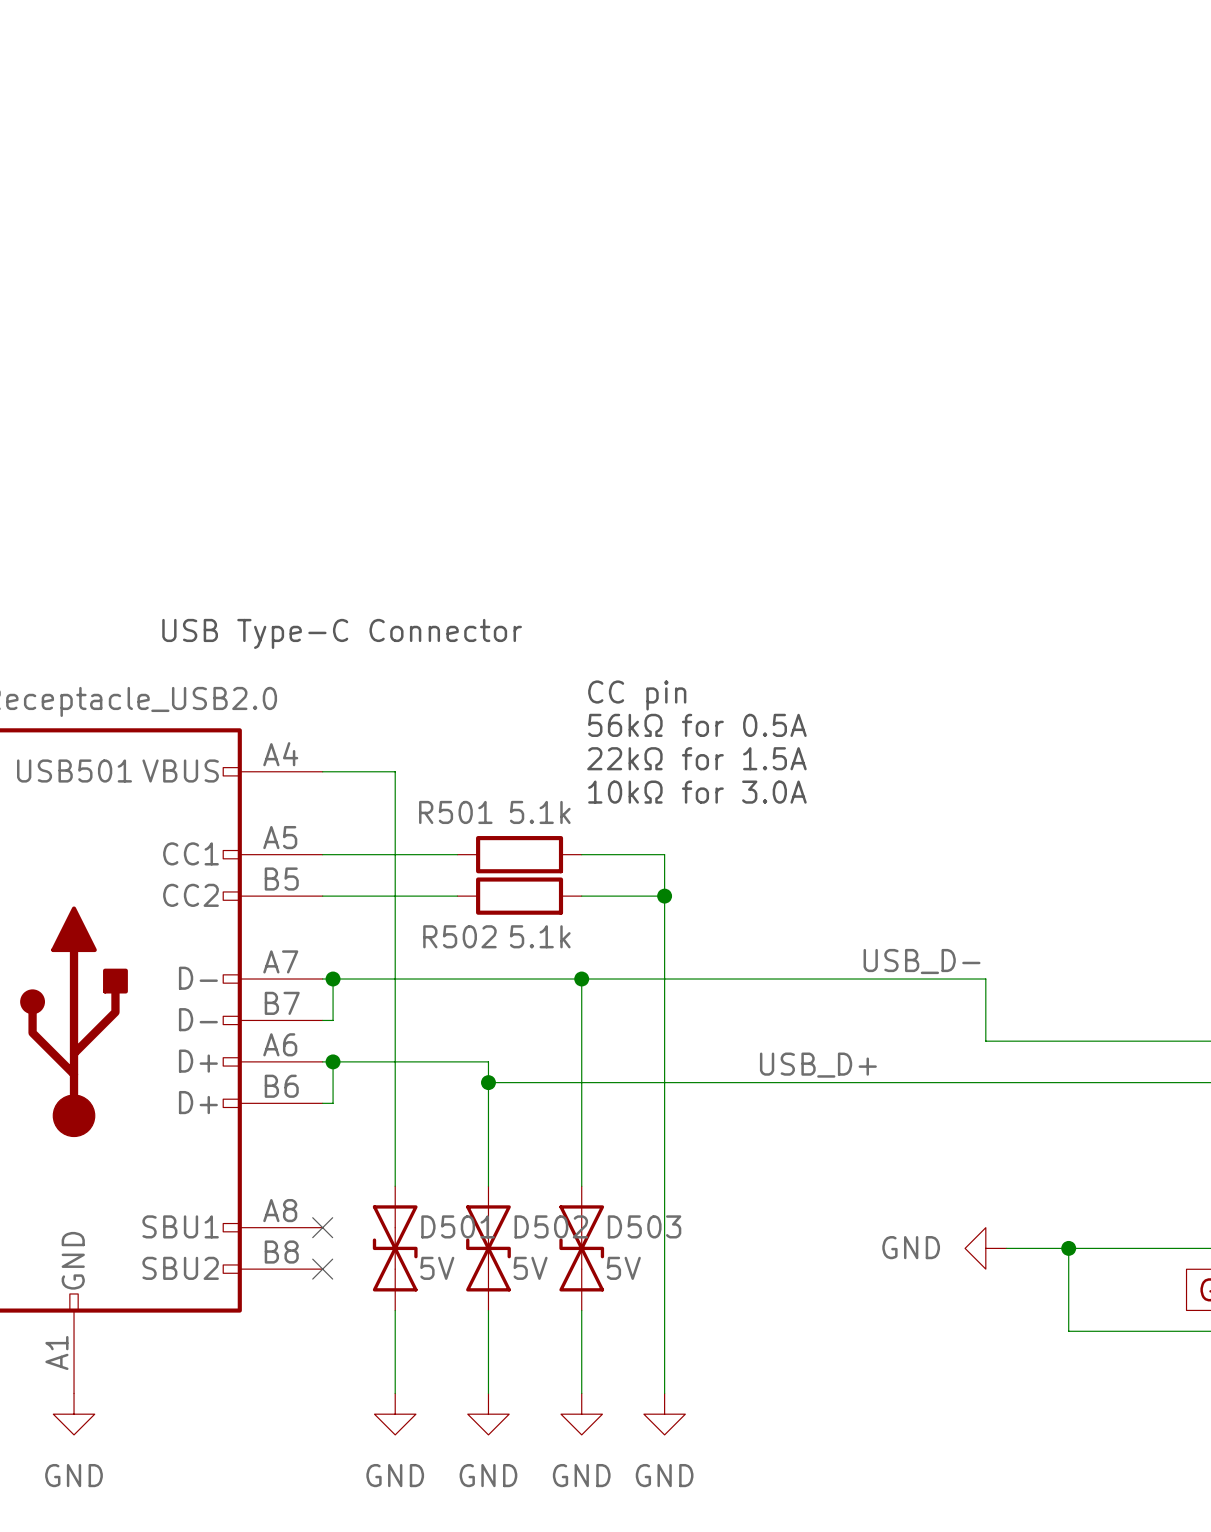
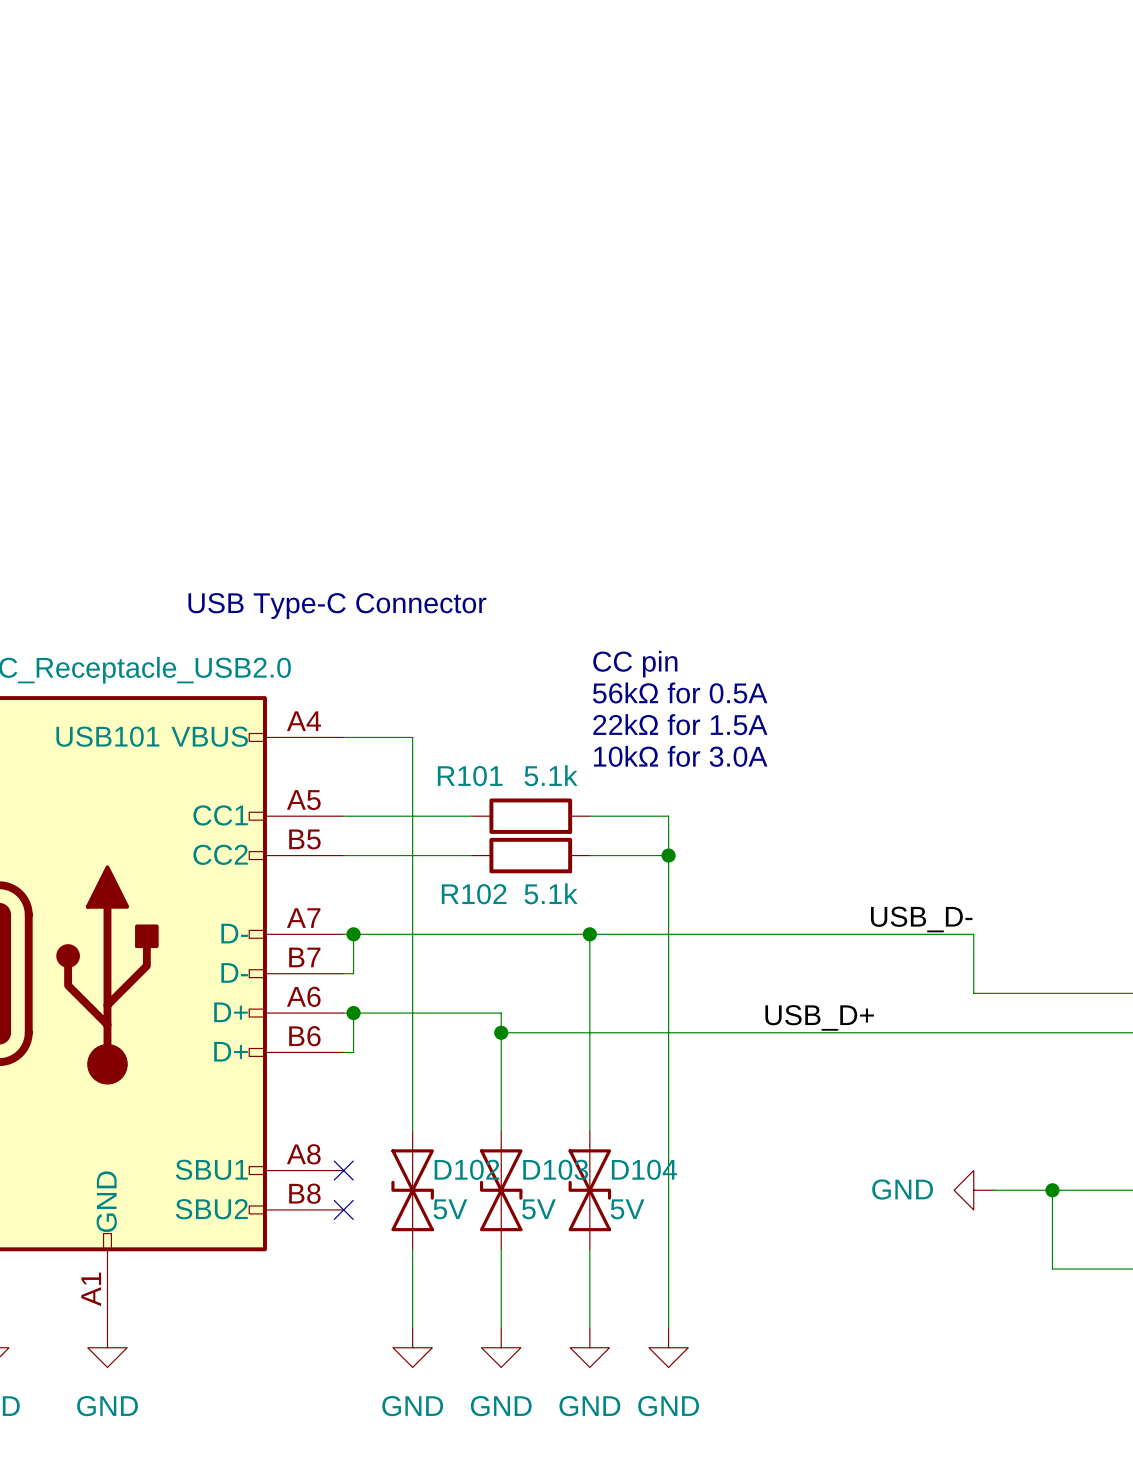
USB501 name: USB501 (74, 771) -> USB101 (107, 736)
R501 name: R501 (455, 812) -> R101 (470, 776)
R502 name: R502 (459, 936) -> R102 (474, 894)
D501 name: D501 (458, 1226) -> D102 (466, 1169)
D502 name: D502 (551, 1226) -> D103 (555, 1169)
D503 name: D503 (644, 1226) -> D104 (644, 1169)

